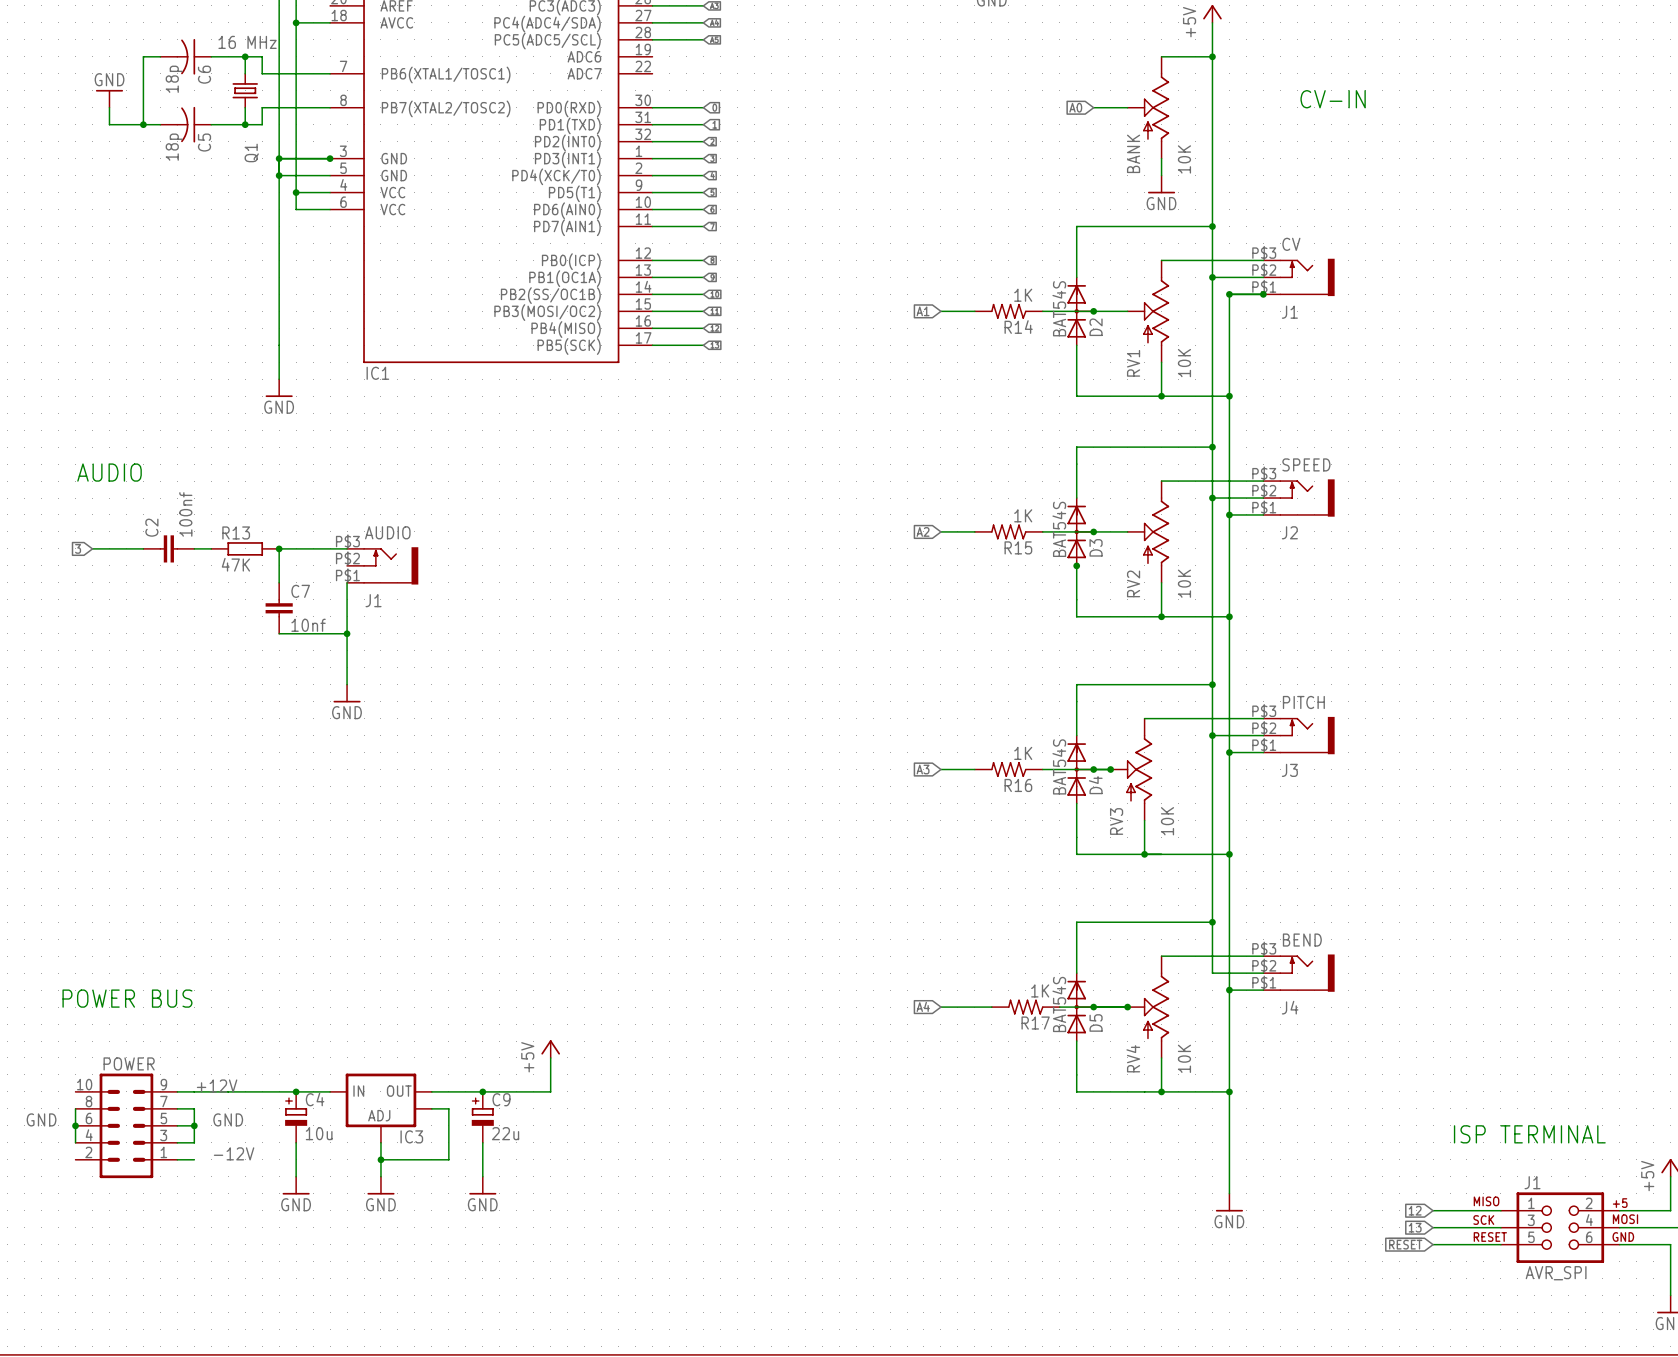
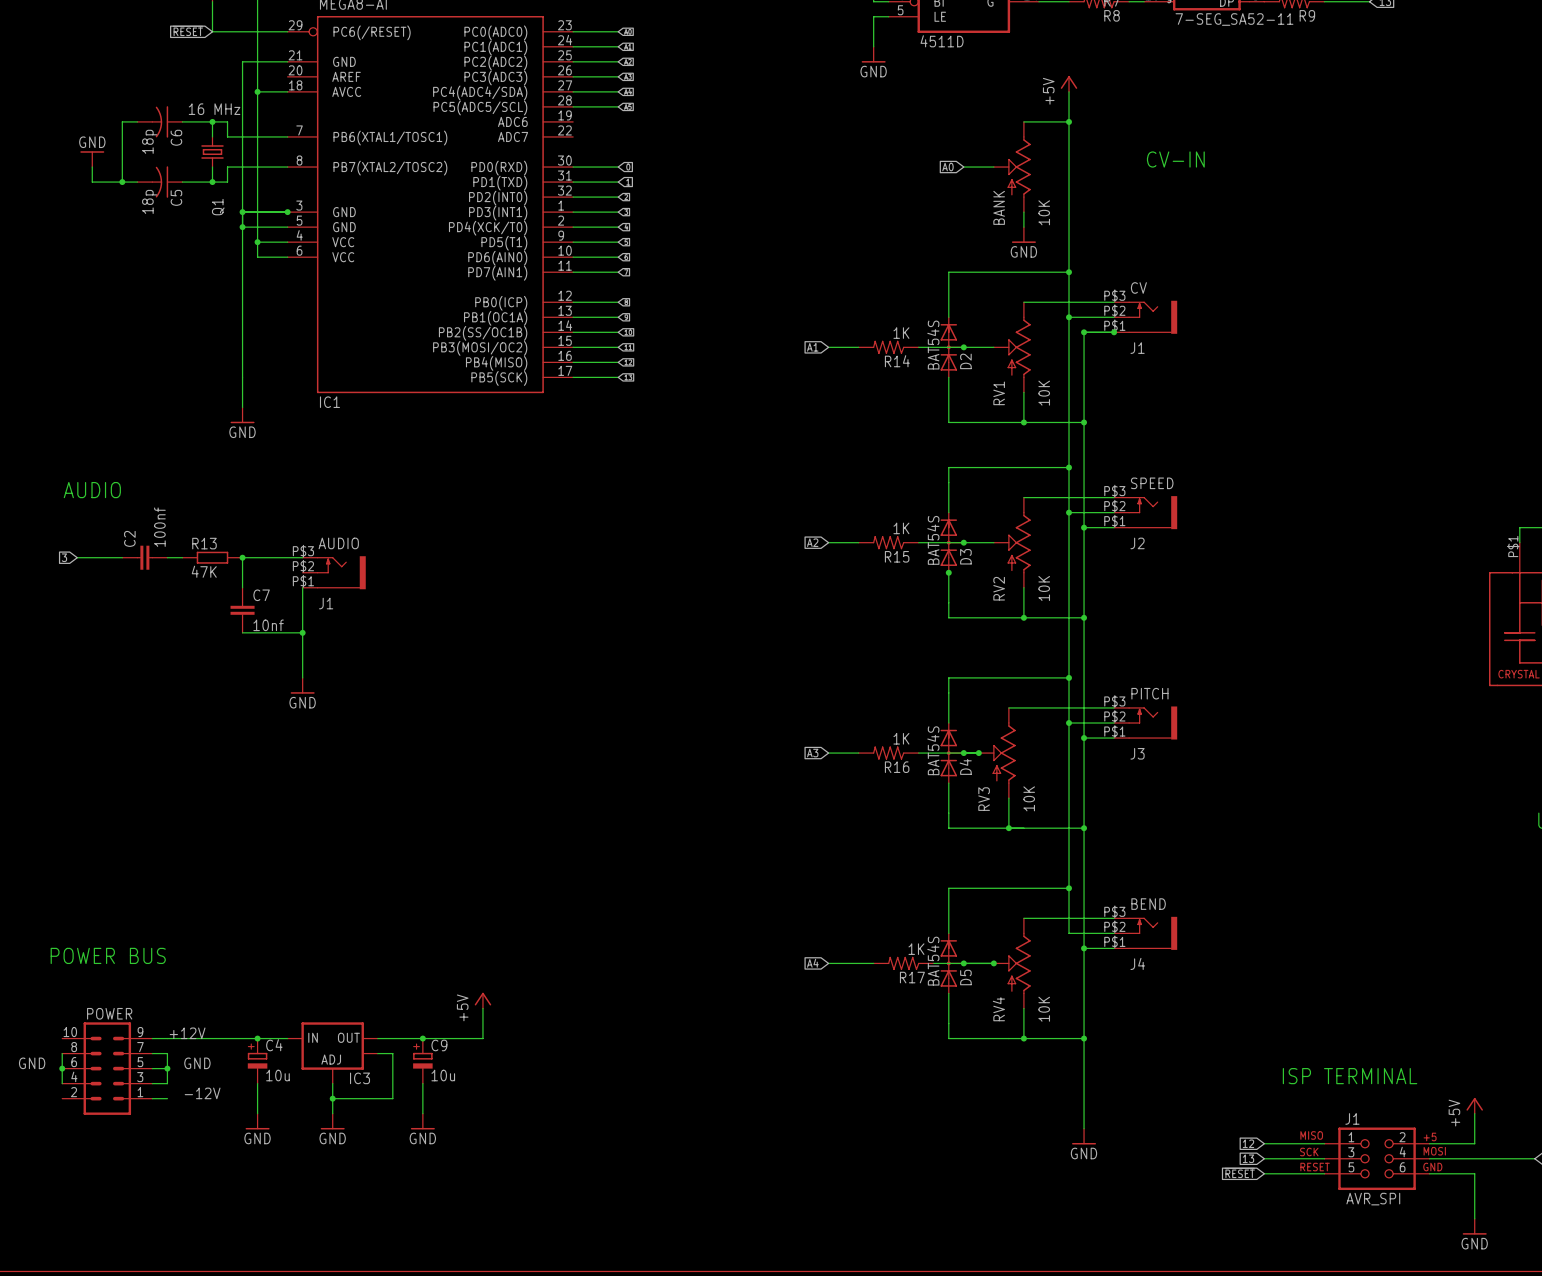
C9 value: 22u (505, 1133) -> 10u (443, 1075)

